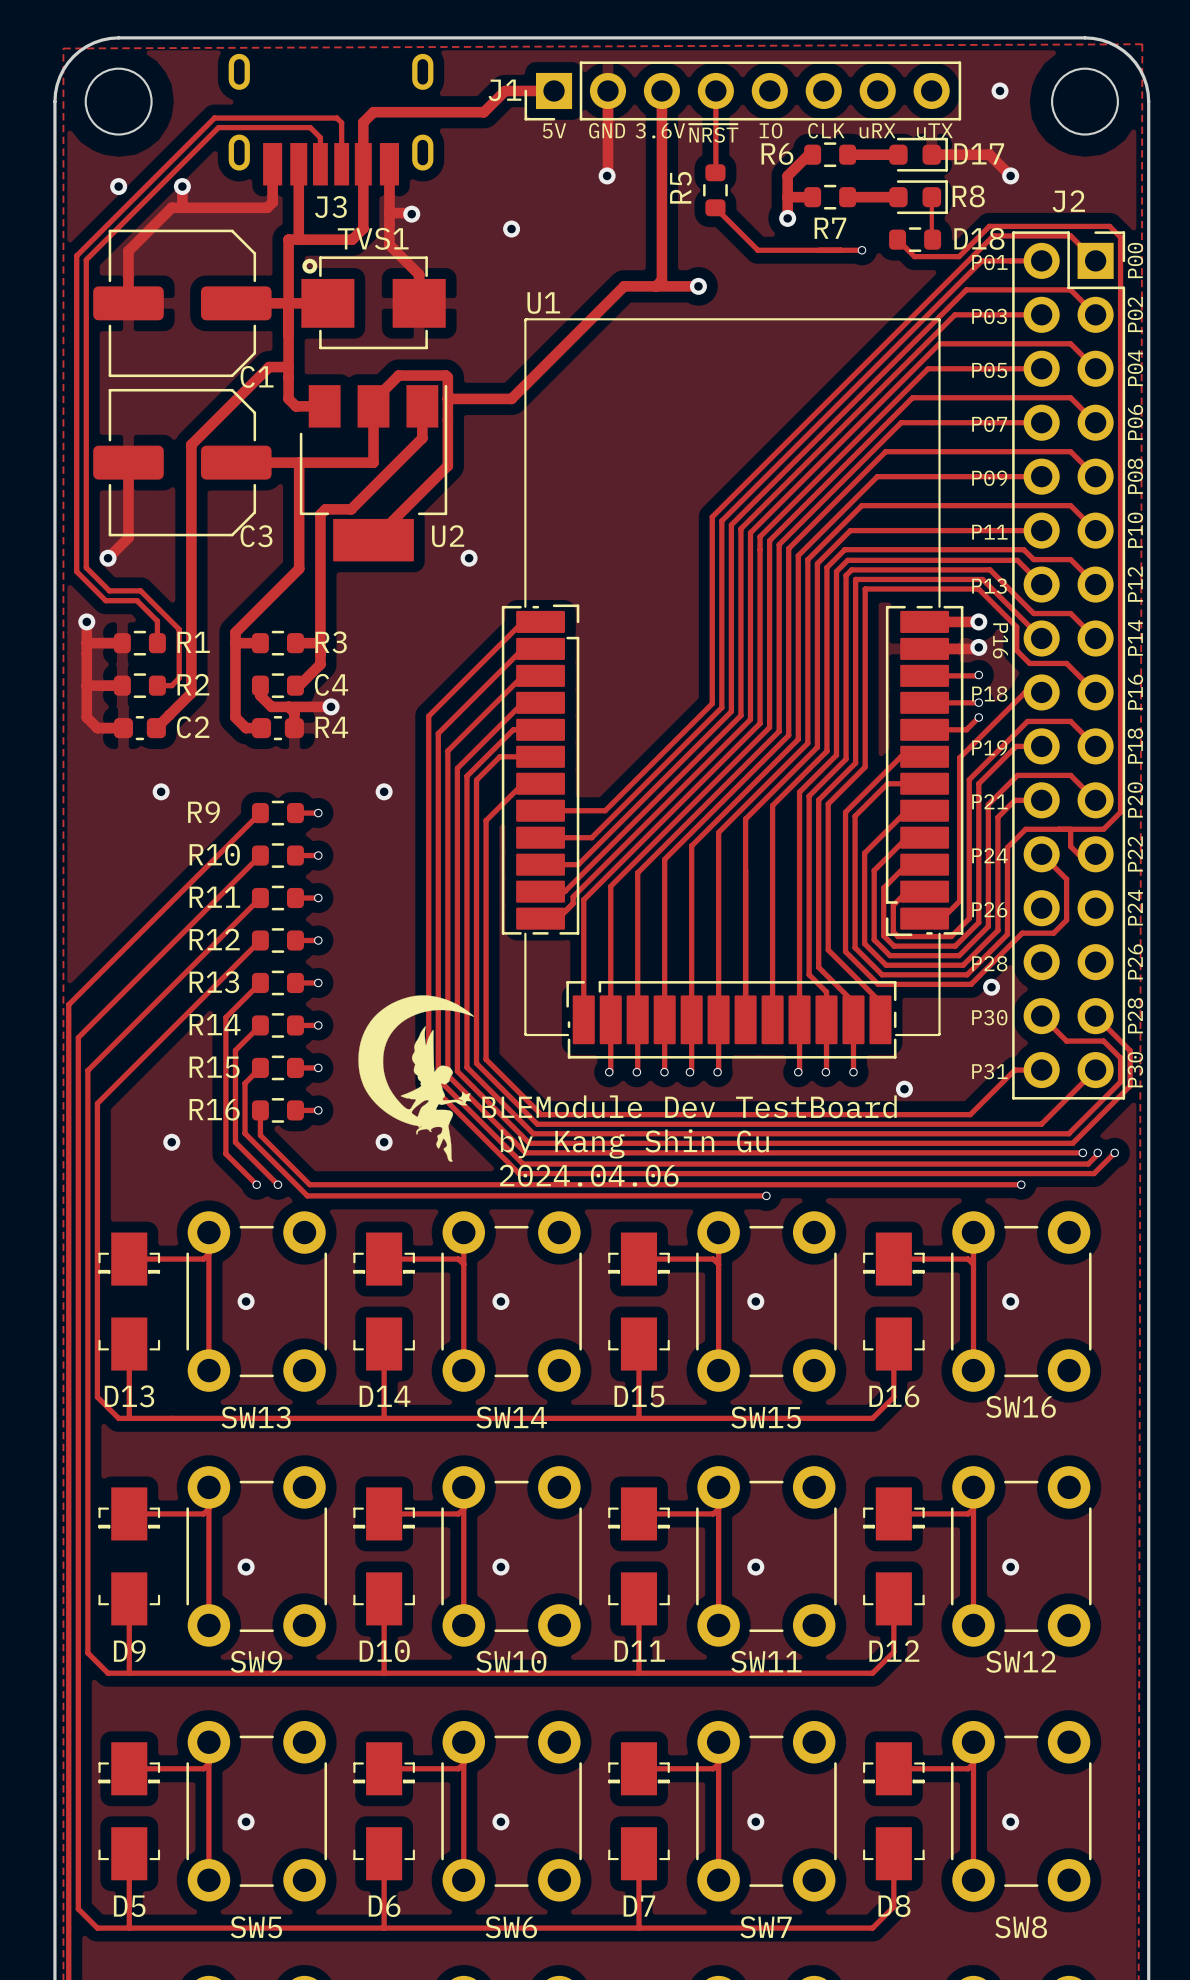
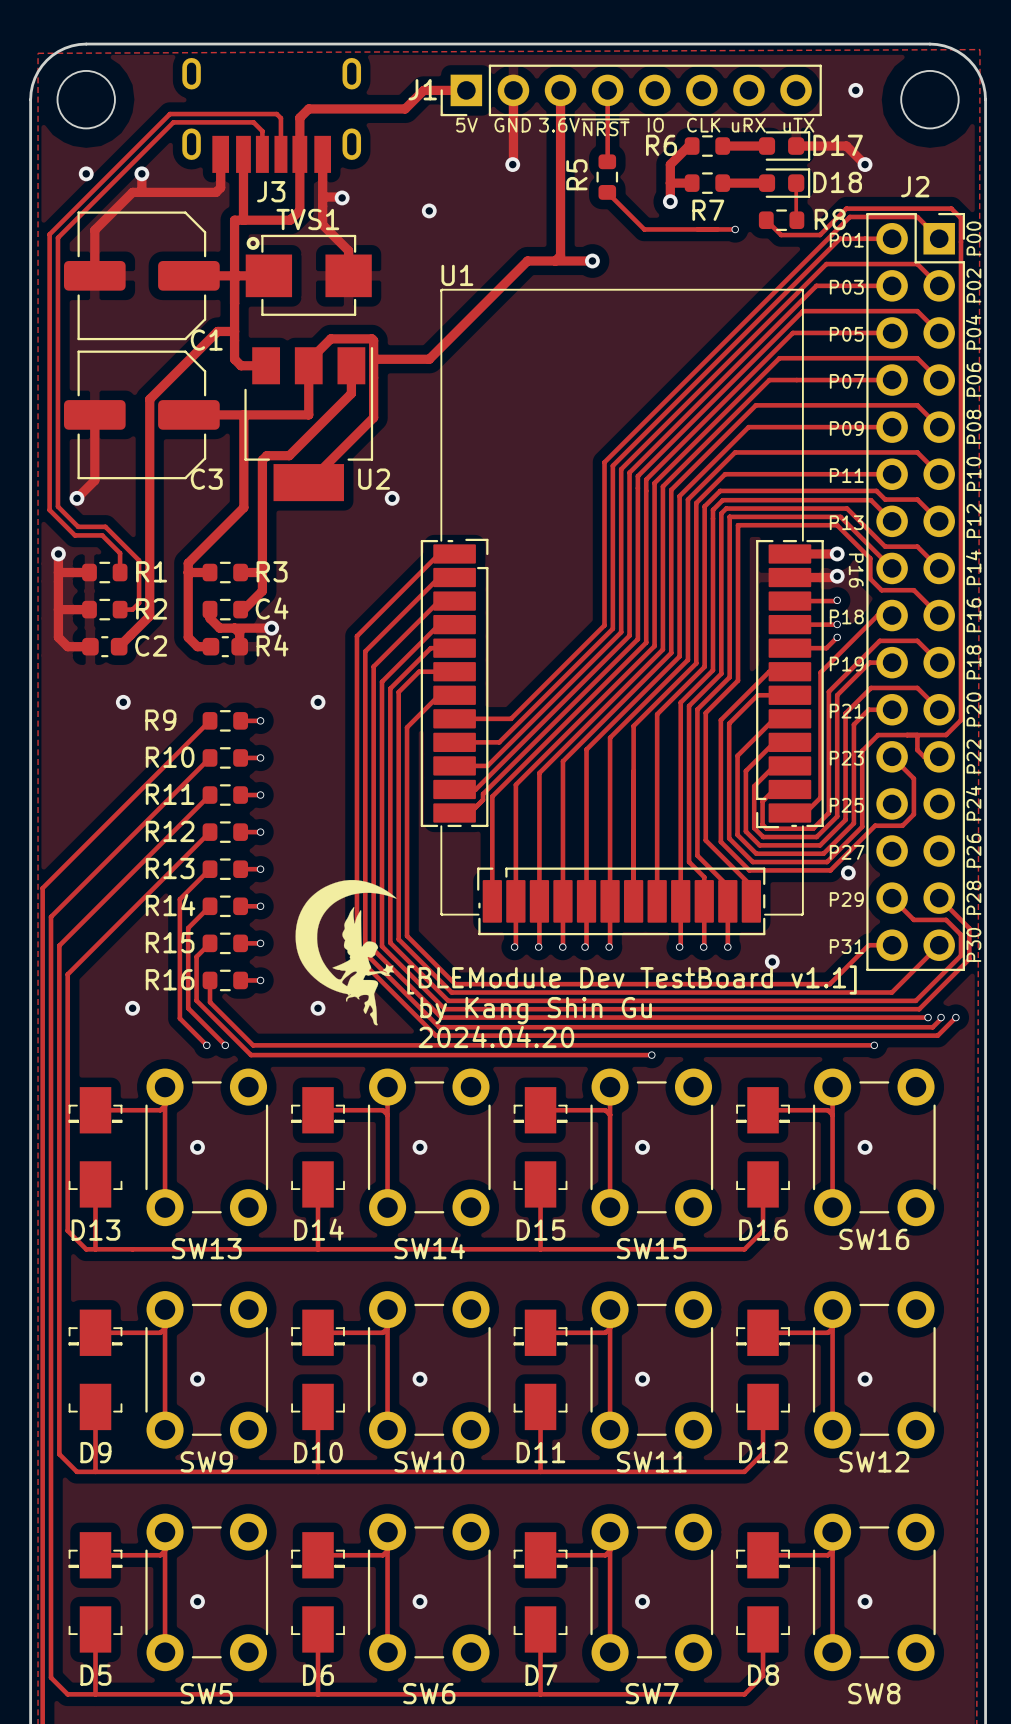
R8 name position: R8 (968, 196) -> R8 (830, 219)
D18 name position: D18 (979, 238) -> D18 (837, 182)
text: P24 (989, 855) -> P23 (846, 758)
text: P26 (989, 909) -> P25 (846, 805)
text: P28 (989, 963) -> P27 (847, 852)
text: P30 (989, 1017) -> P29 (846, 899)
text: BLEModule Dev TestBoard (689, 1106) -> [BLEModule Dev TestBoard v1.1] (631, 979)
text: 2024.04.06 (589, 1175) -> 2024.04.20 (496, 1036)

